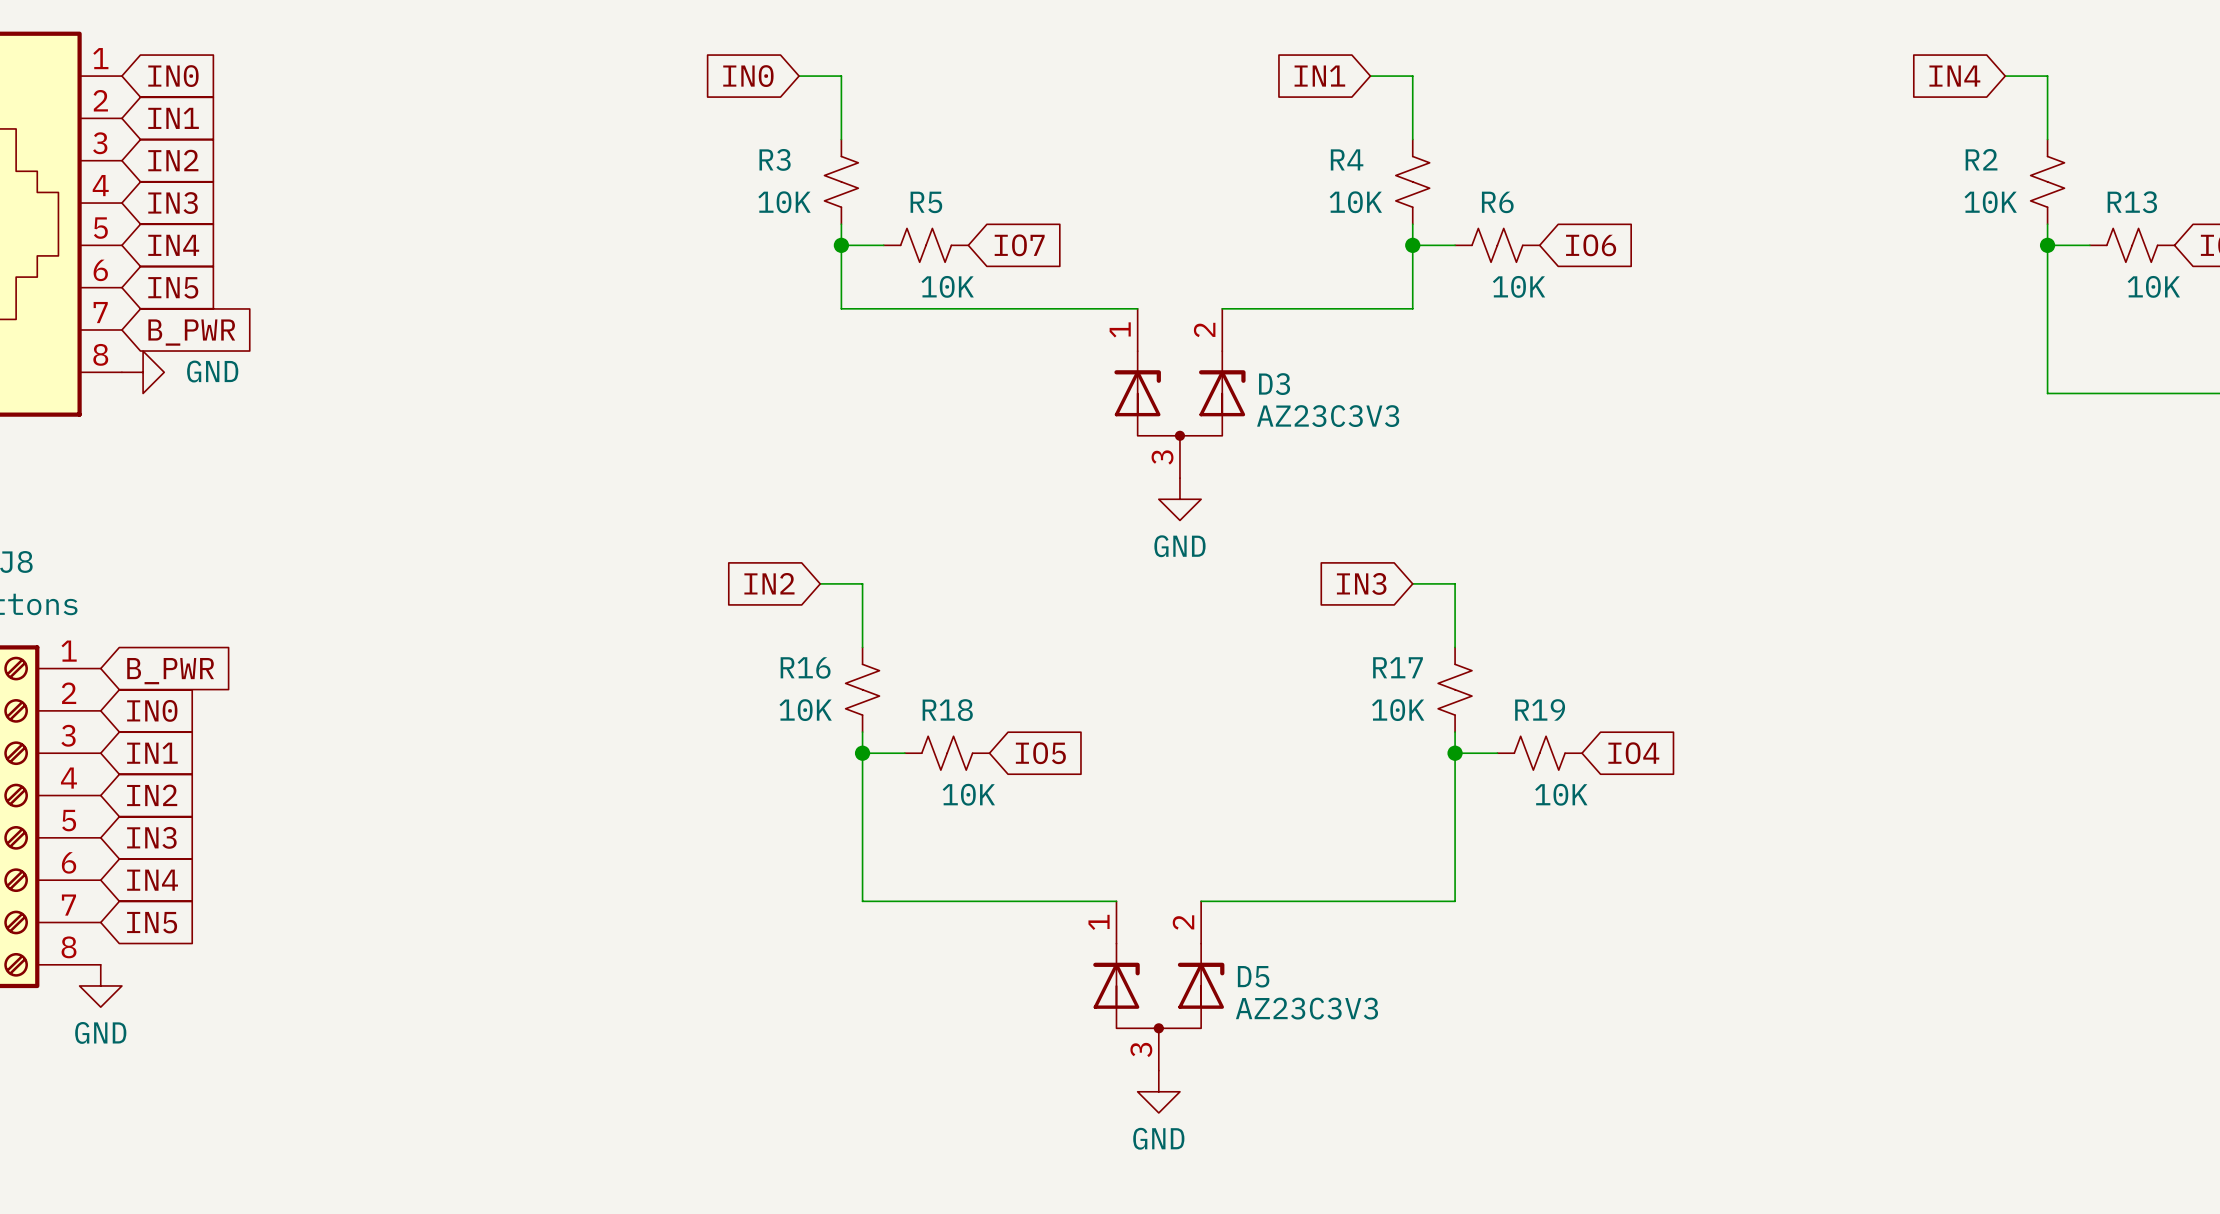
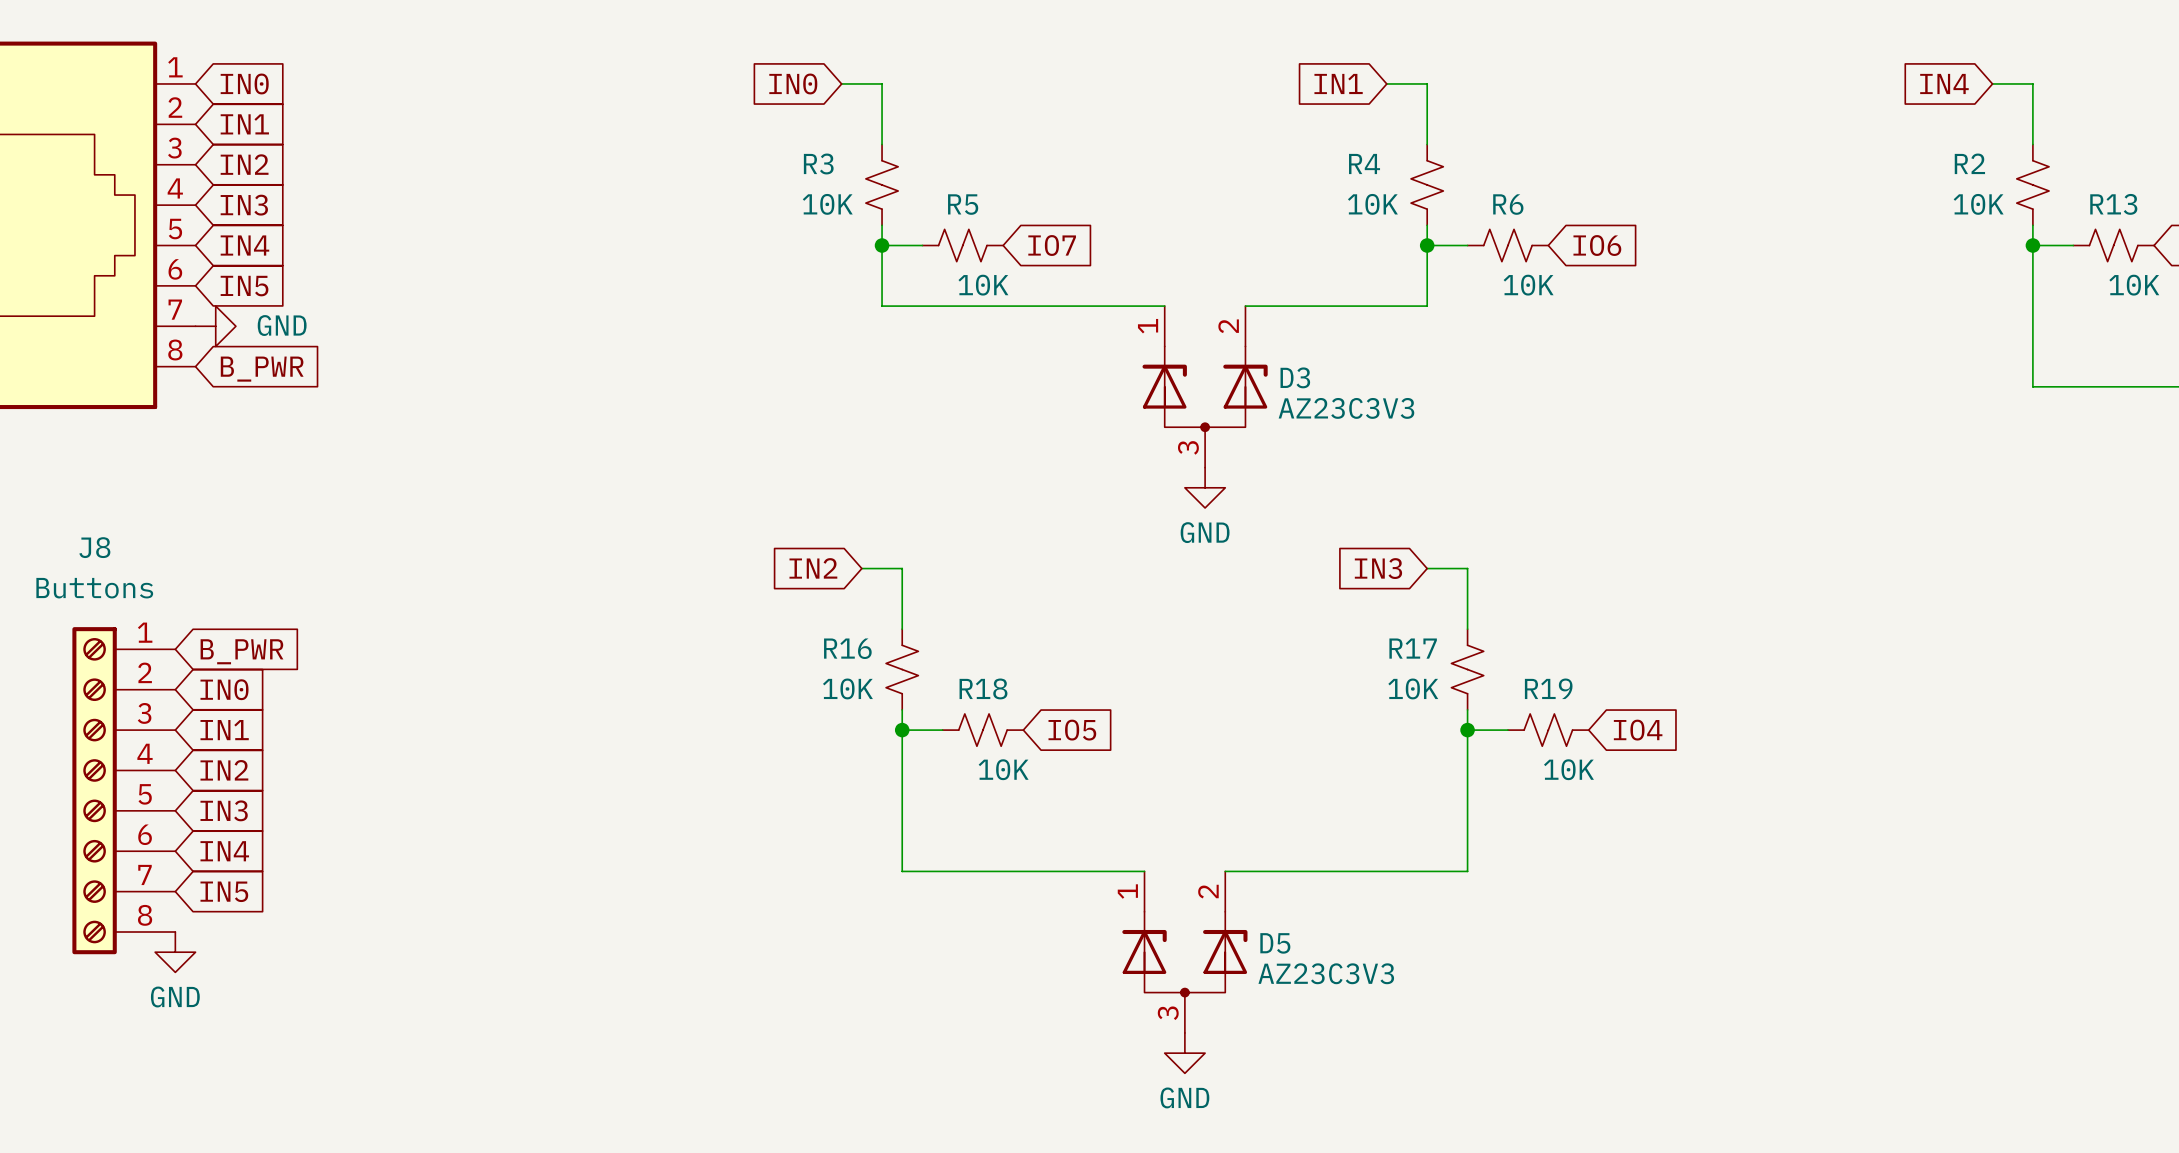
global label position: B_PWR (191, 332) -> B_PWR (262, 369)
power symbol position: GND (143, 372) -> GND (215, 326)

